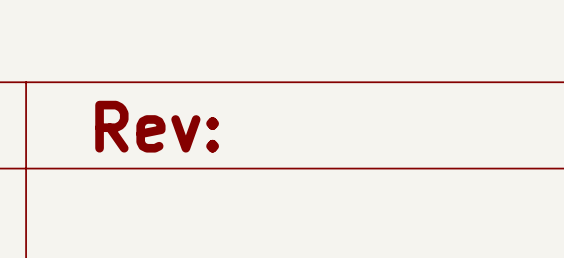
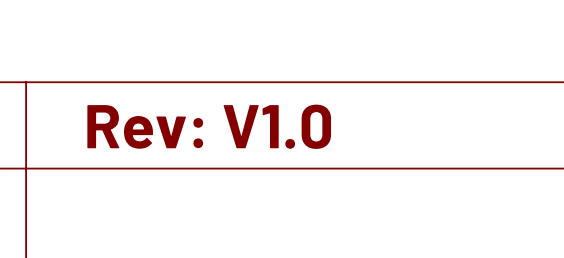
title block: Rev: (157, 126) -> Rev: V1.0 (209, 126)

